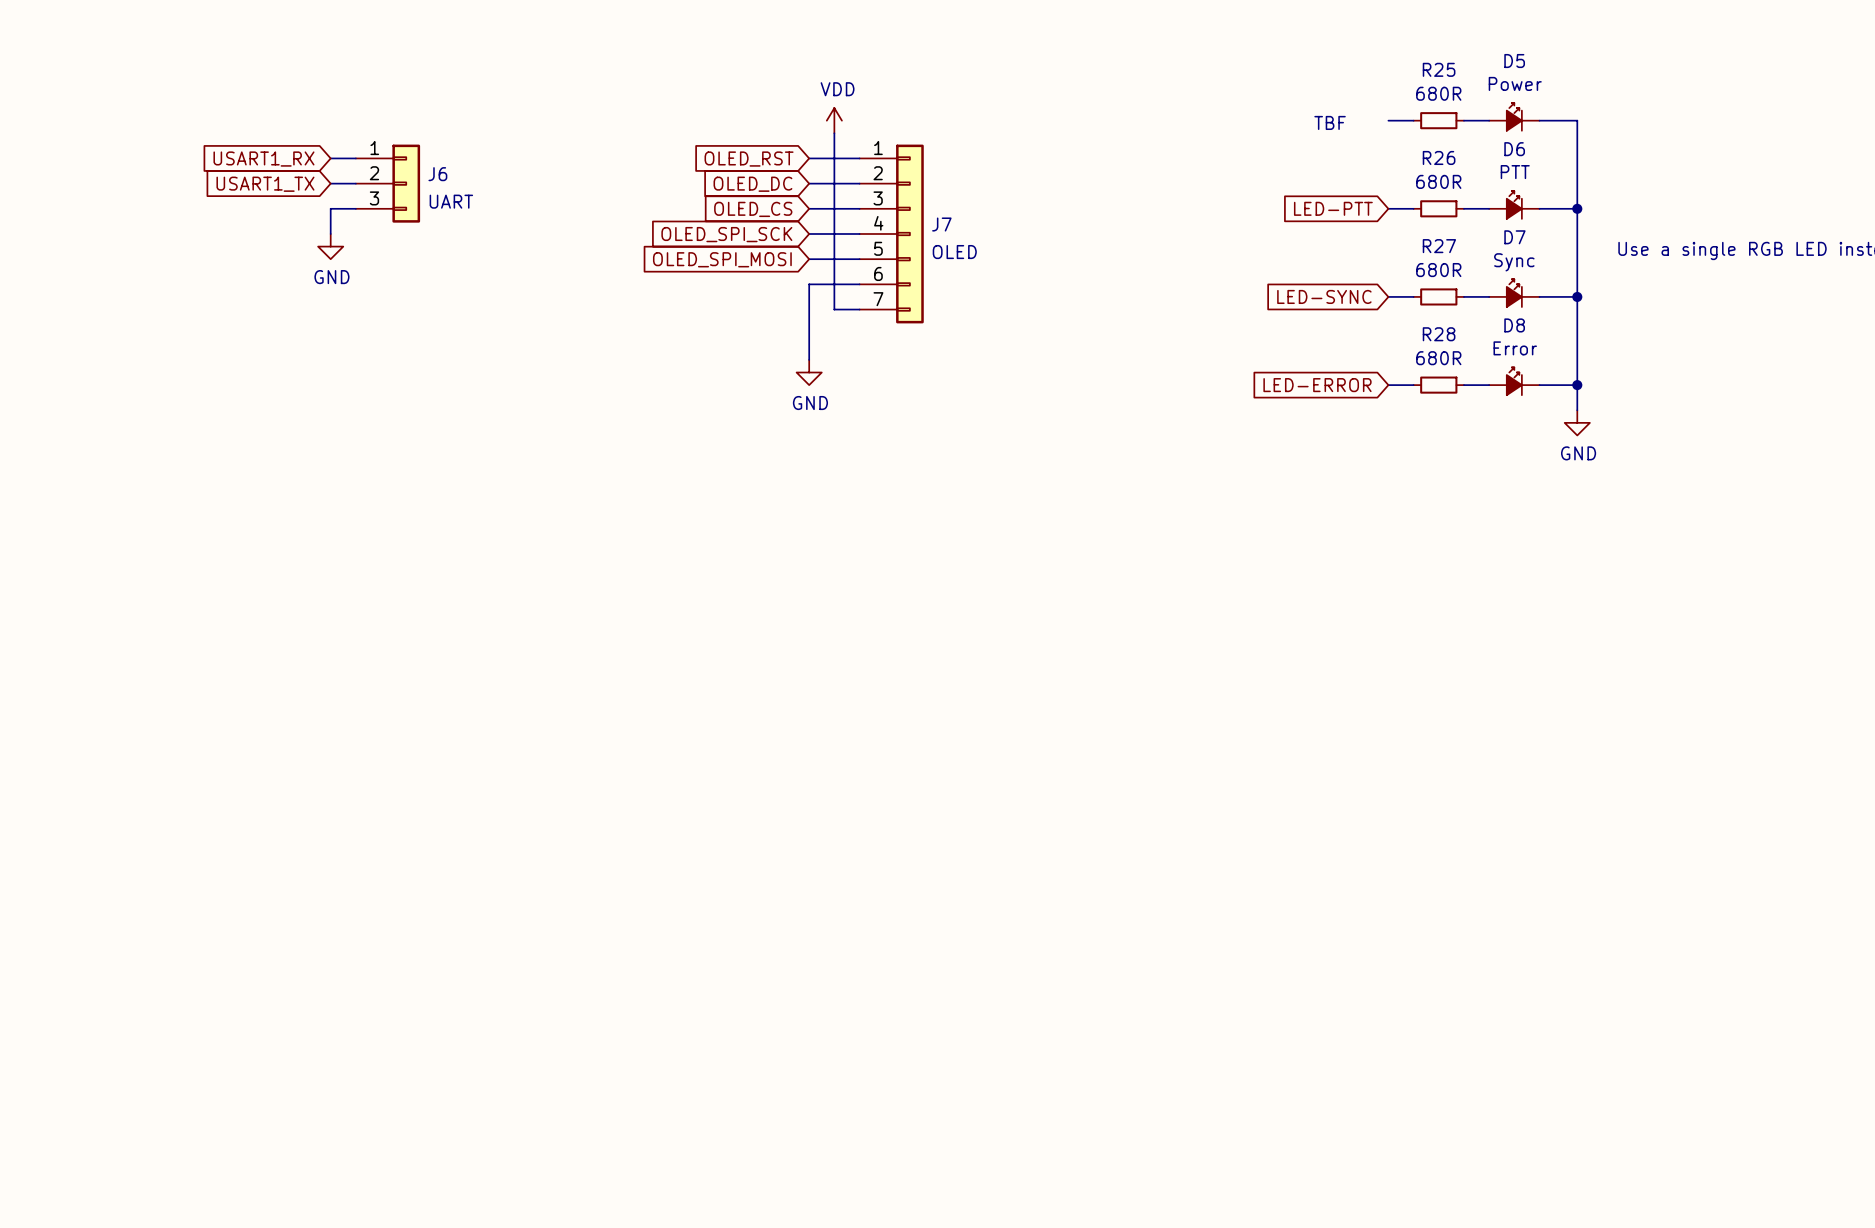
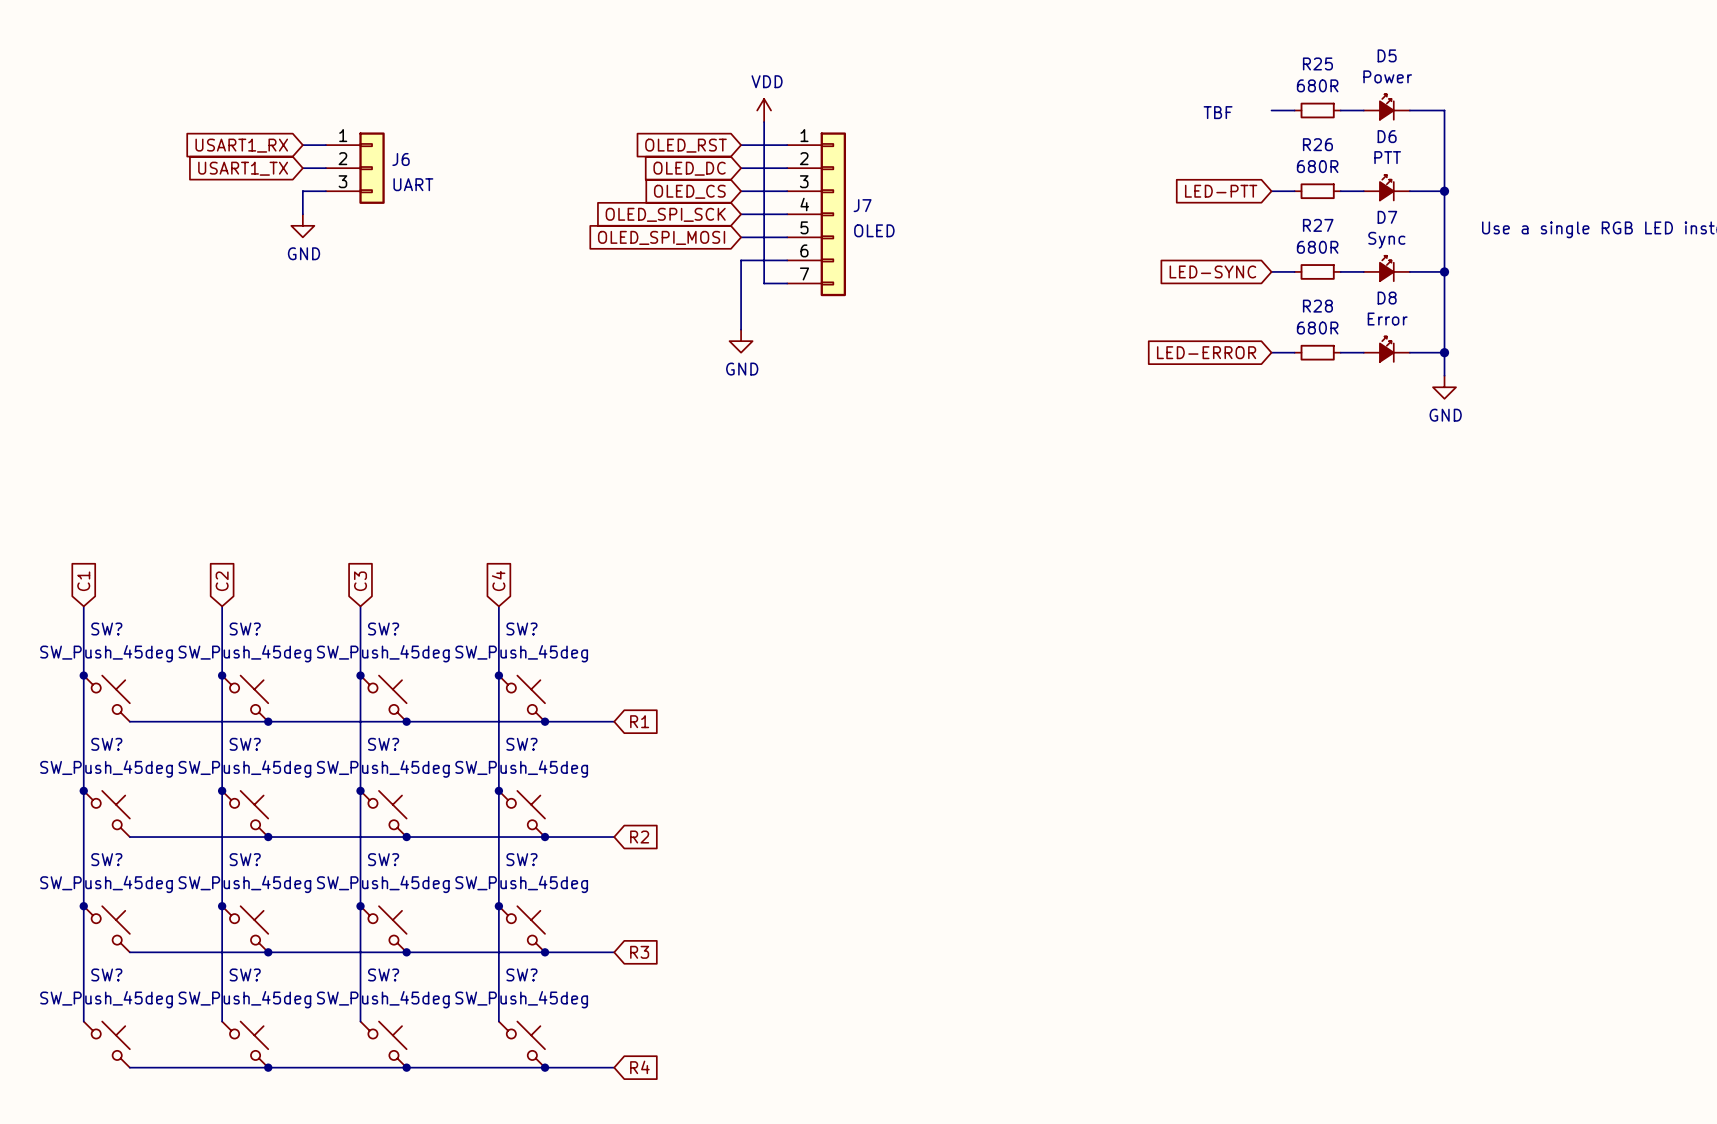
global label: none -> C1 (83, 581)
global label: none -> C2 (222, 581)
global label: none -> C3 (360, 581)
global label: none -> C4 (498, 580)
wire: none -> (83, 606) (83, 1021)
wire: none -> (222, 606) (222, 1021)
wire: none -> (360, 606) (360, 1021)
wire: none -> (498, 606) (498, 1021)
junction: none -> (83, 675)
junction: none -> (222, 675)
junction: none -> (360, 675)
junction: none -> (498, 675)
SW?: none -> SW_Push_45deg (106, 698)
SW?: none -> SW_Push_45deg (245, 698)
SW?: none -> SW_Push_45deg (383, 698)
SW?: none -> SW_Push_45deg (521, 698)
wire: none -> (129, 721) (614, 721)
junction: none -> (268, 721)
junction: none -> (406, 721)
junction: none -> (545, 721)
global label: none -> R1 (639, 721)
junction: none -> (83, 790)
junction: none -> (222, 790)
junction: none -> (360, 790)
junction: none -> (498, 790)
SW?: none -> SW_Push_45deg (106, 813)
SW?: none -> SW_Push_45deg (245, 813)
SW?: none -> SW_Push_45deg (383, 813)
SW?: none -> SW_Push_45deg (521, 813)
wire: none -> (129, 837) (614, 837)
junction: none -> (268, 837)
junction: none -> (406, 837)
junction: none -> (545, 837)
global label: none -> R2 (639, 837)
junction: none -> (83, 906)
junction: none -> (222, 906)
junction: none -> (360, 906)
junction: none -> (498, 906)
SW?: none -> SW_Push_45deg (106, 929)
SW?: none -> SW_Push_45deg (245, 929)
SW?: none -> SW_Push_45deg (383, 929)
SW?: none -> SW_Push_45deg (521, 929)
wire: none -> (129, 952) (614, 952)
junction: none -> (268, 952)
junction: none -> (406, 952)
junction: none -> (545, 952)
global label: none -> R3 (639, 952)
SW?: none -> SW_Push_45deg (106, 1044)
SW?: none -> SW_Push_45deg (245, 1044)
SW?: none -> SW_Push_45deg (383, 1044)
SW?: none -> SW_Push_45deg (521, 1044)
wire: none -> (129, 1067) (614, 1067)
junction: none -> (268, 1067)
junction: none -> (406, 1067)
junction: none -> (545, 1067)
global label: none -> R4 (639, 1067)

